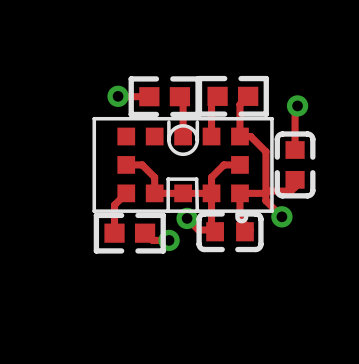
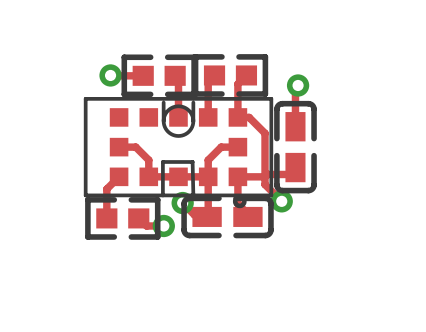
part footprint: [274, 131, 316, 199] -> [274, 100, 317, 194]
part footprint: [196, 211, 264, 253] -> [181, 195, 274, 239]

